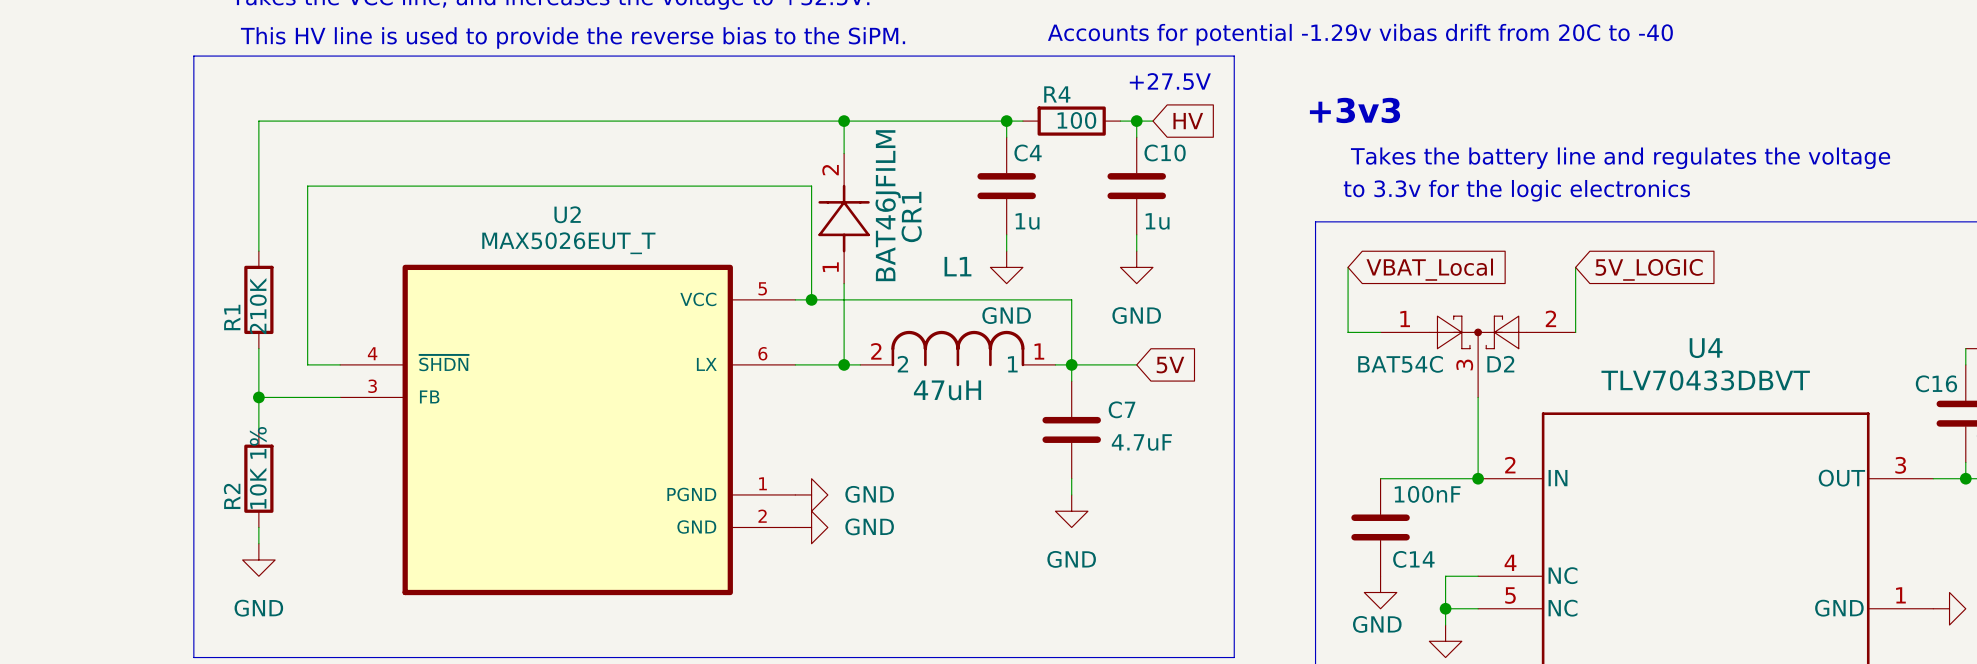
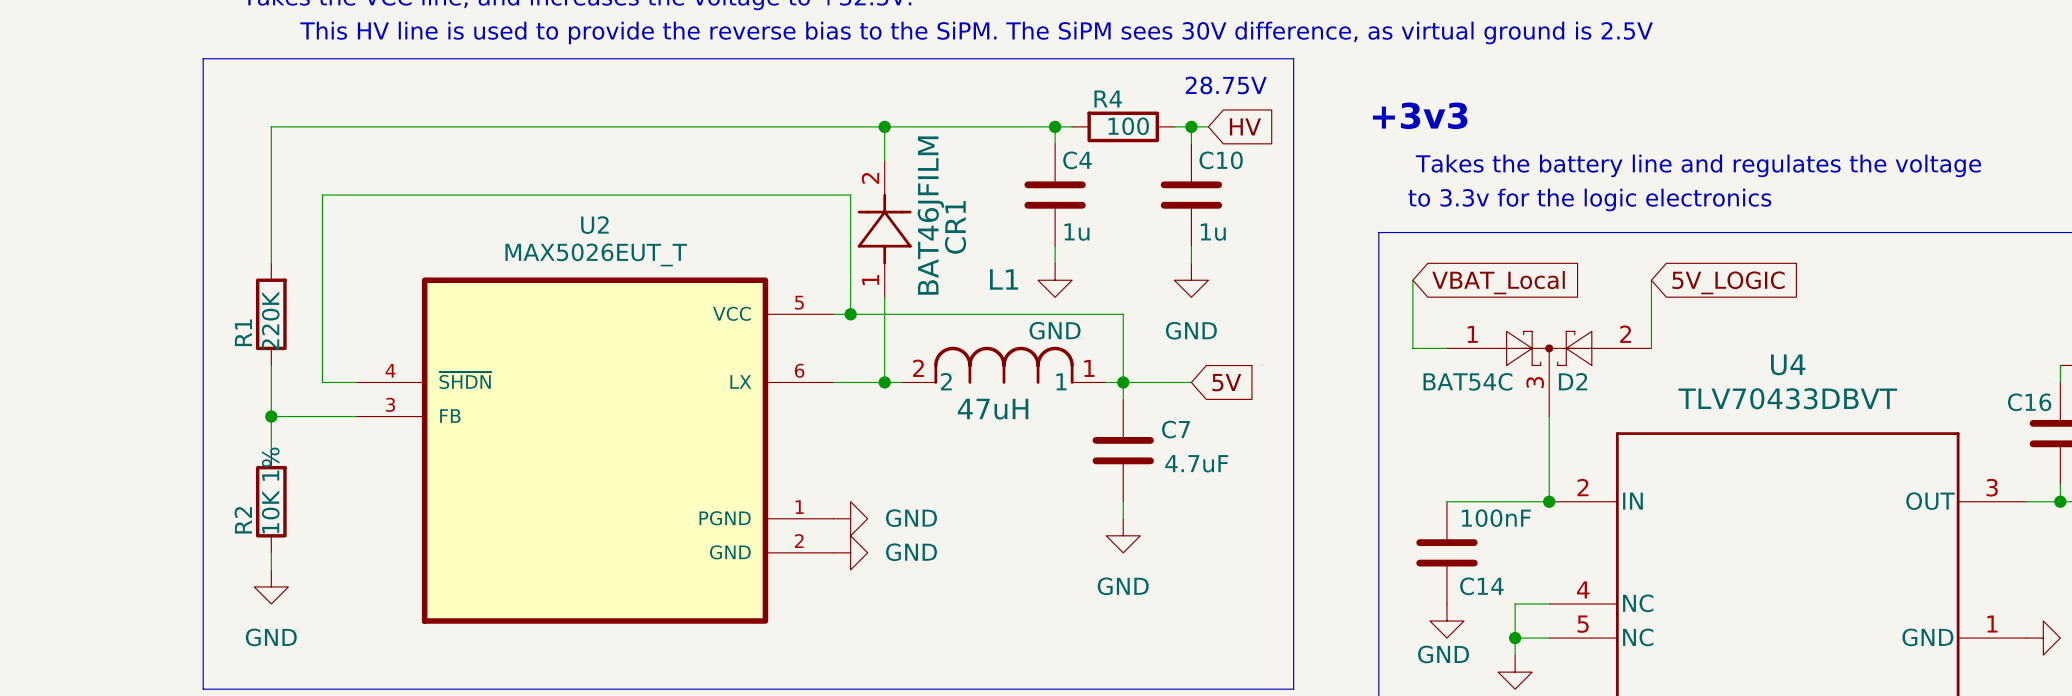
text: none -> This HV line is used to provide the reverse bias to the SiPM. The SiPM sees 30V difference, as virtual ground is 2.5V (976, 32)
text: Accounts for potential -1.29v vibas drift from 20C to -40 (1360, 34) -> none
text: This HV line is used to provide the reverse bias to the SiPM. (573, 37) -> none
text: +27.5V (1170, 81) -> 28.75V (1226, 85)
R1 value: 210K (258, 306) -> 220K (270, 320)

